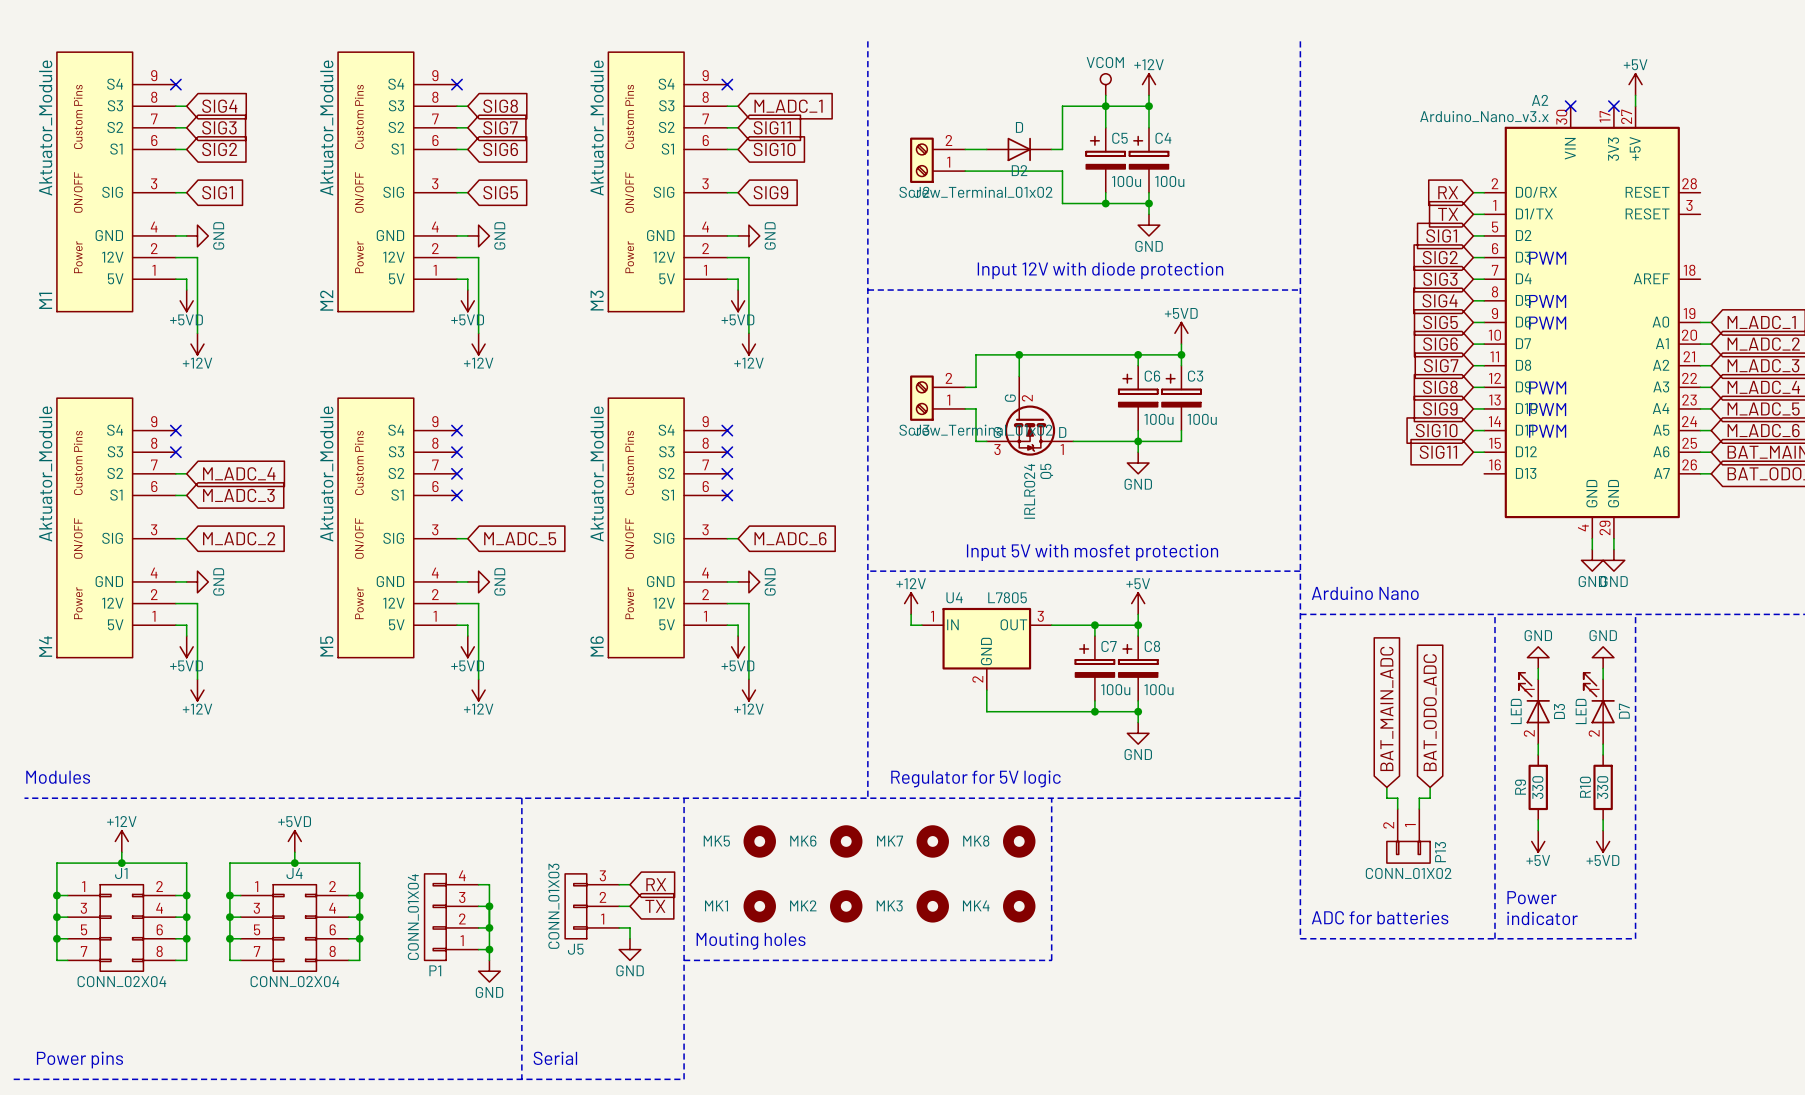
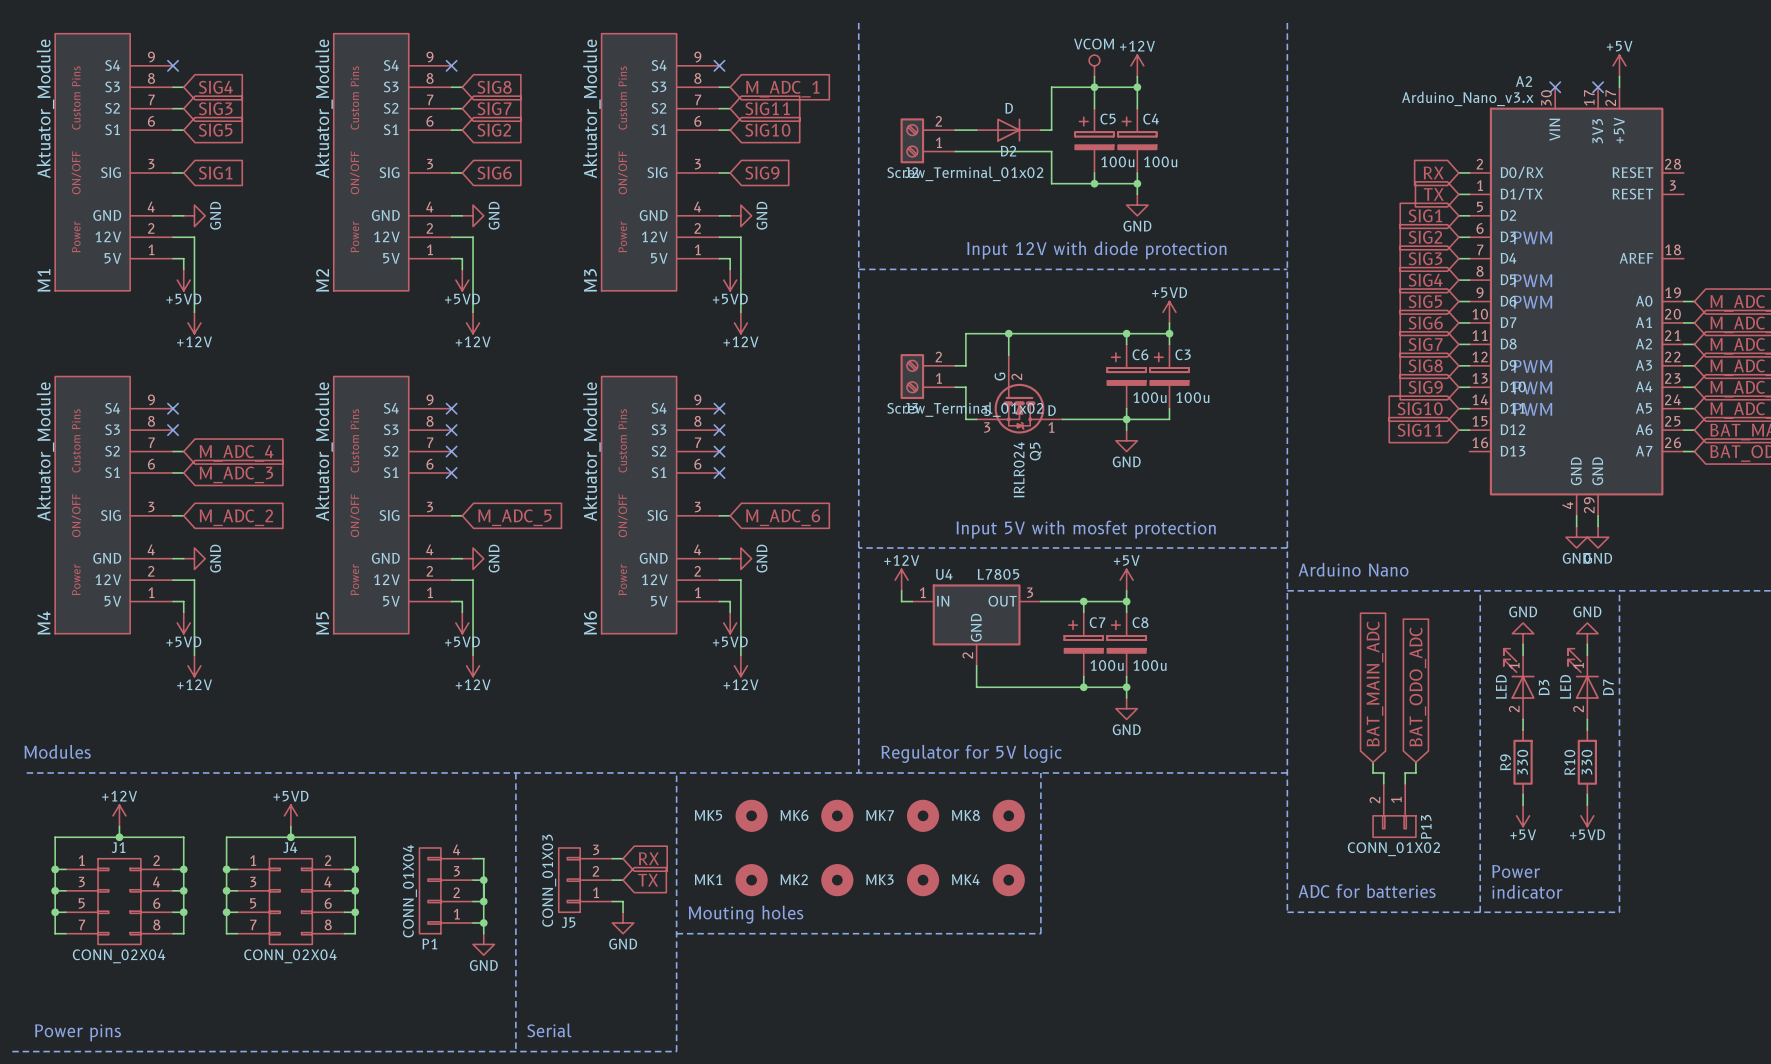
global label: SIG2 (219, 149) -> SIG5 (215, 130)
global label: SIG6 (500, 149) -> SIG2 (494, 130)
global label: SIG5 (500, 192) -> SIG6 (494, 173)

